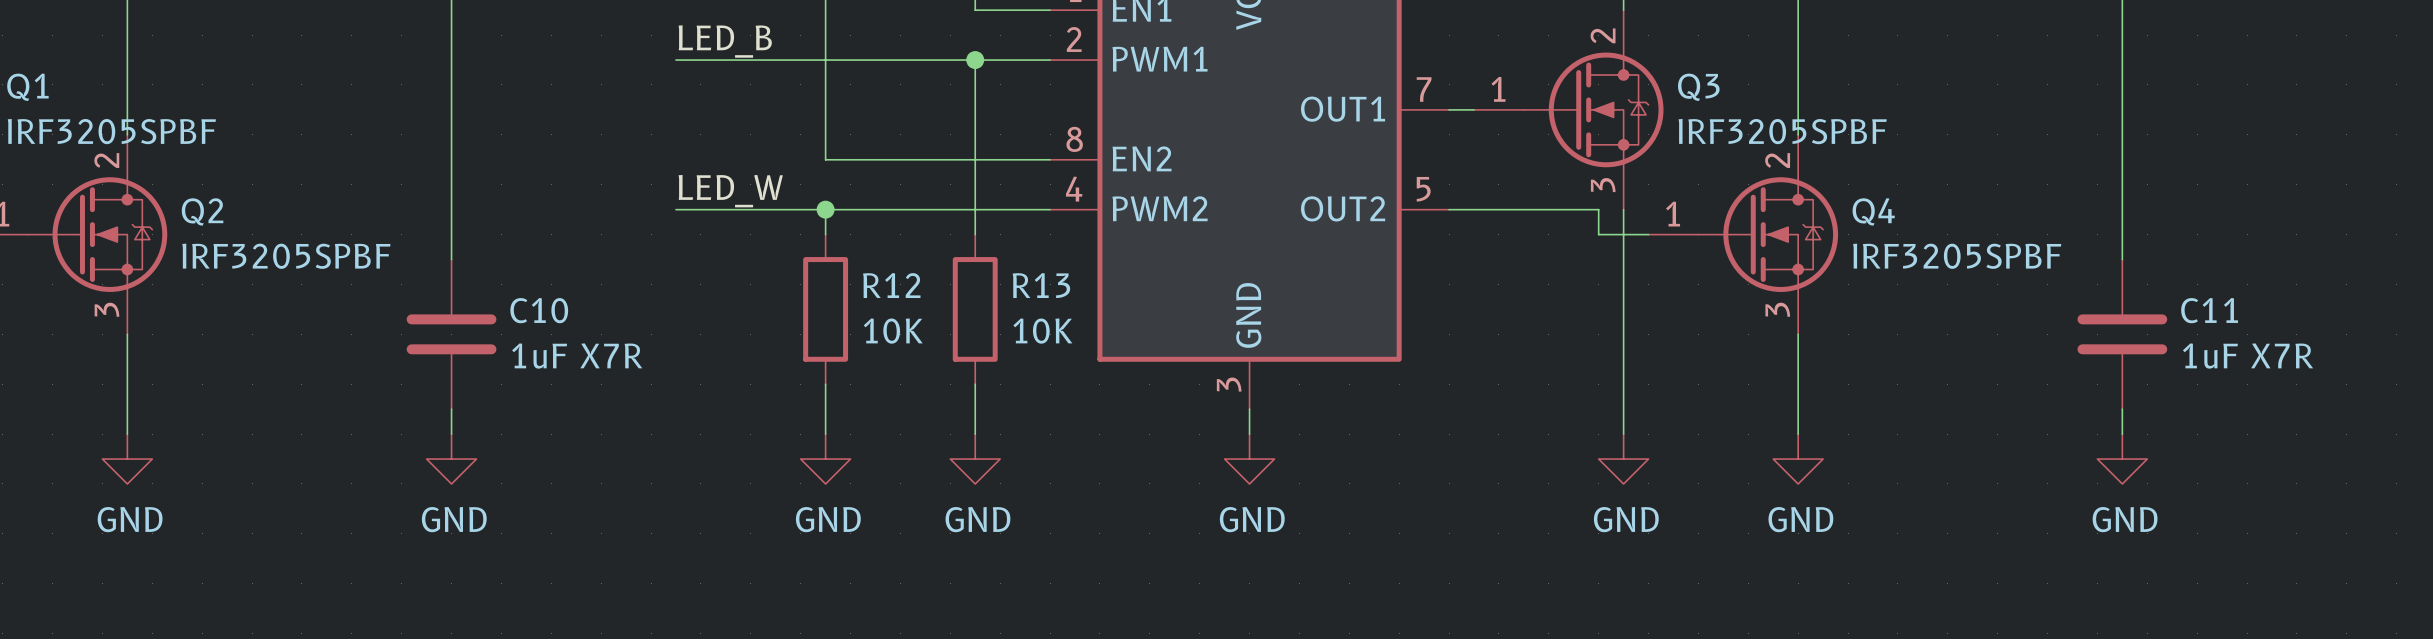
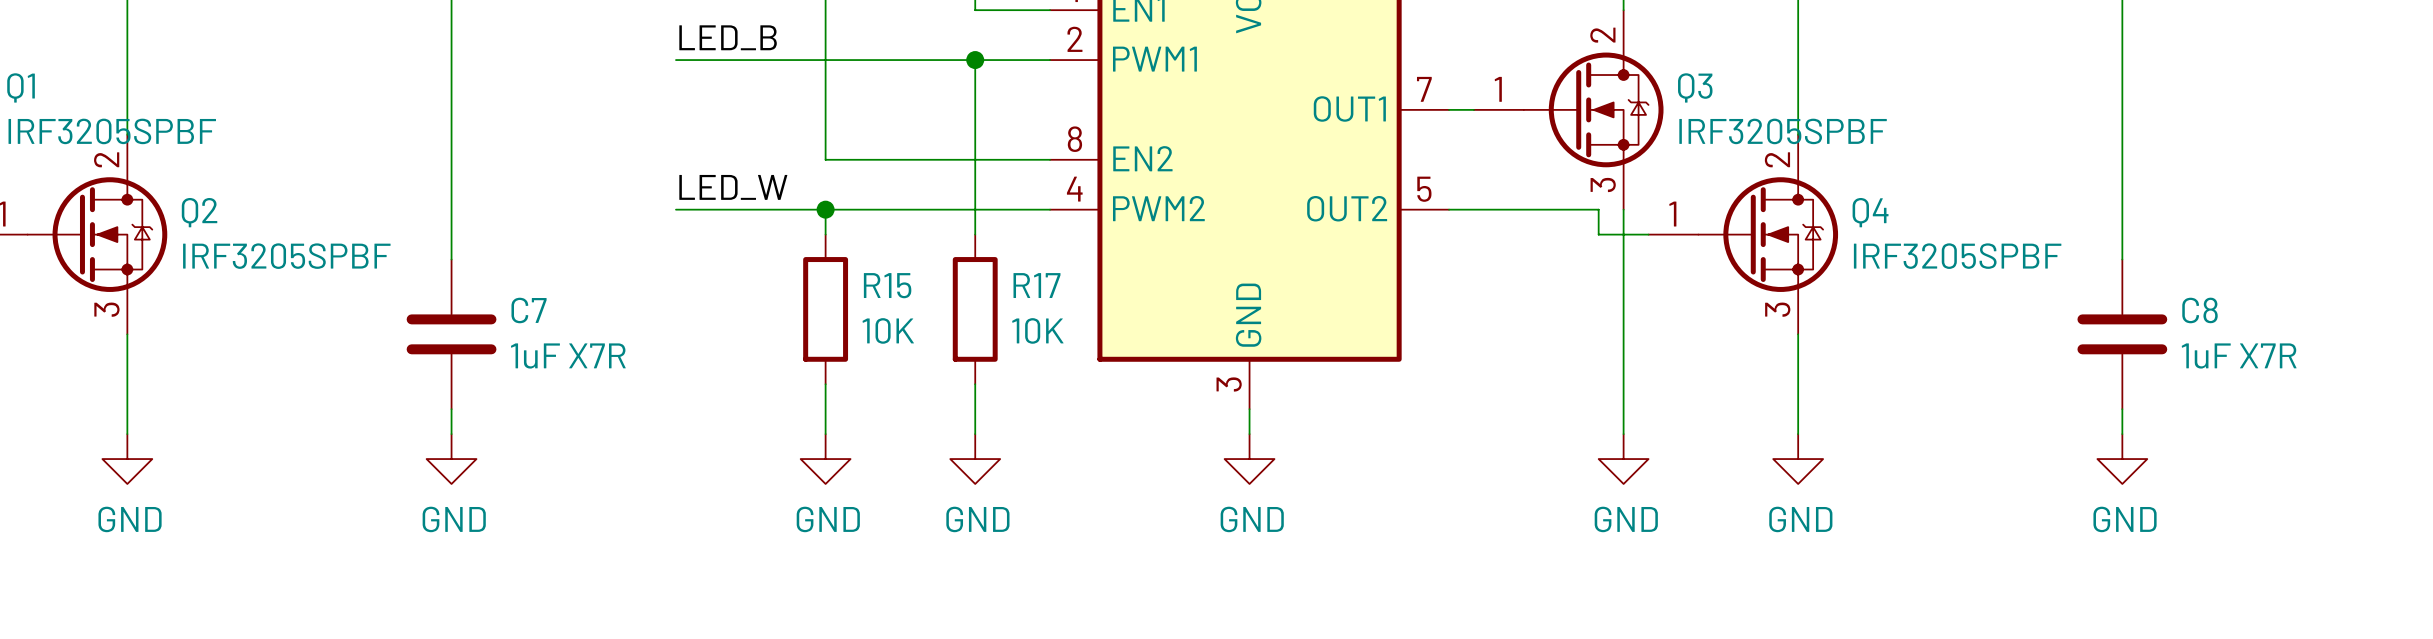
R12 name: R12 (891, 285) -> R15 (887, 285)
R13 name: R13 (1041, 285) -> R17 (1036, 285)
C10 name: C10 (539, 310) -> C7 (529, 310)
C11 name: C11 (2209, 310) -> C8 (2199, 310)

